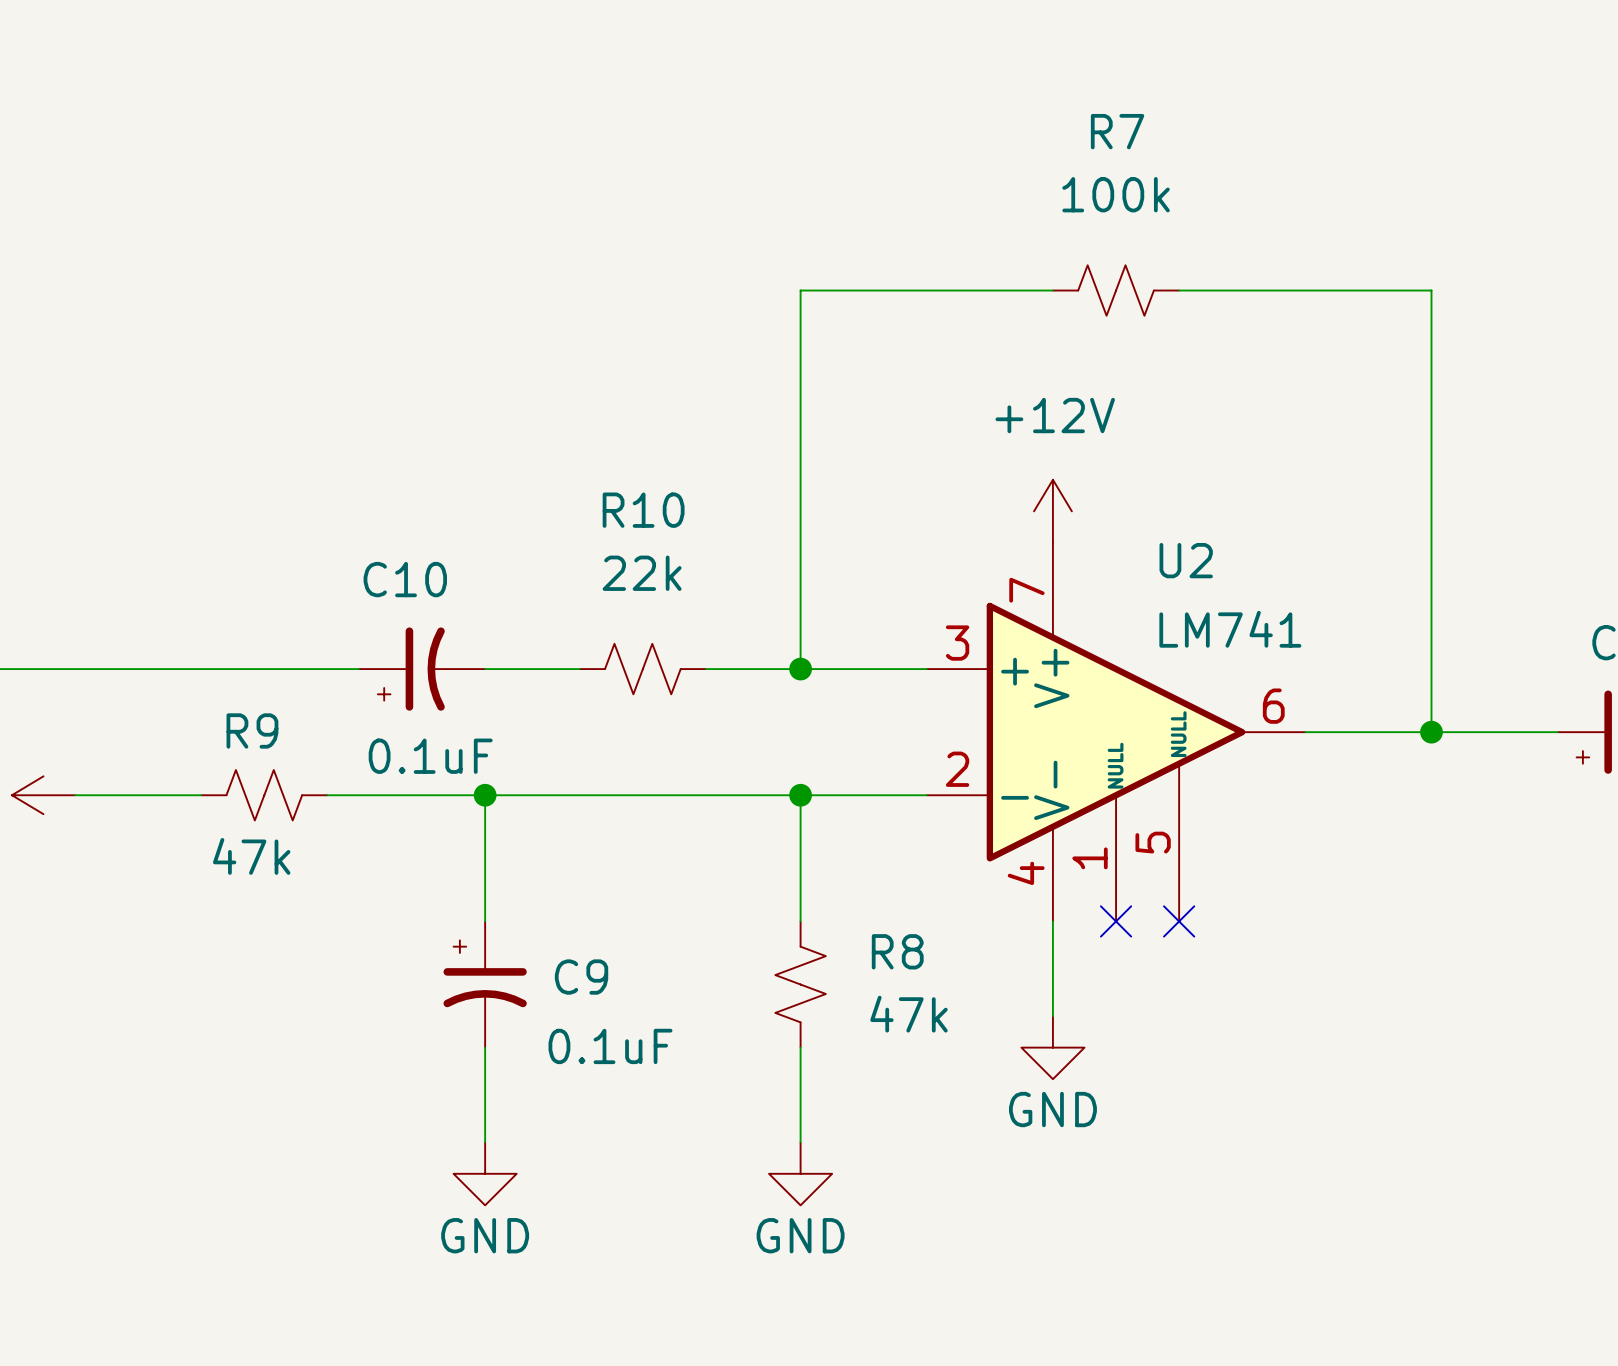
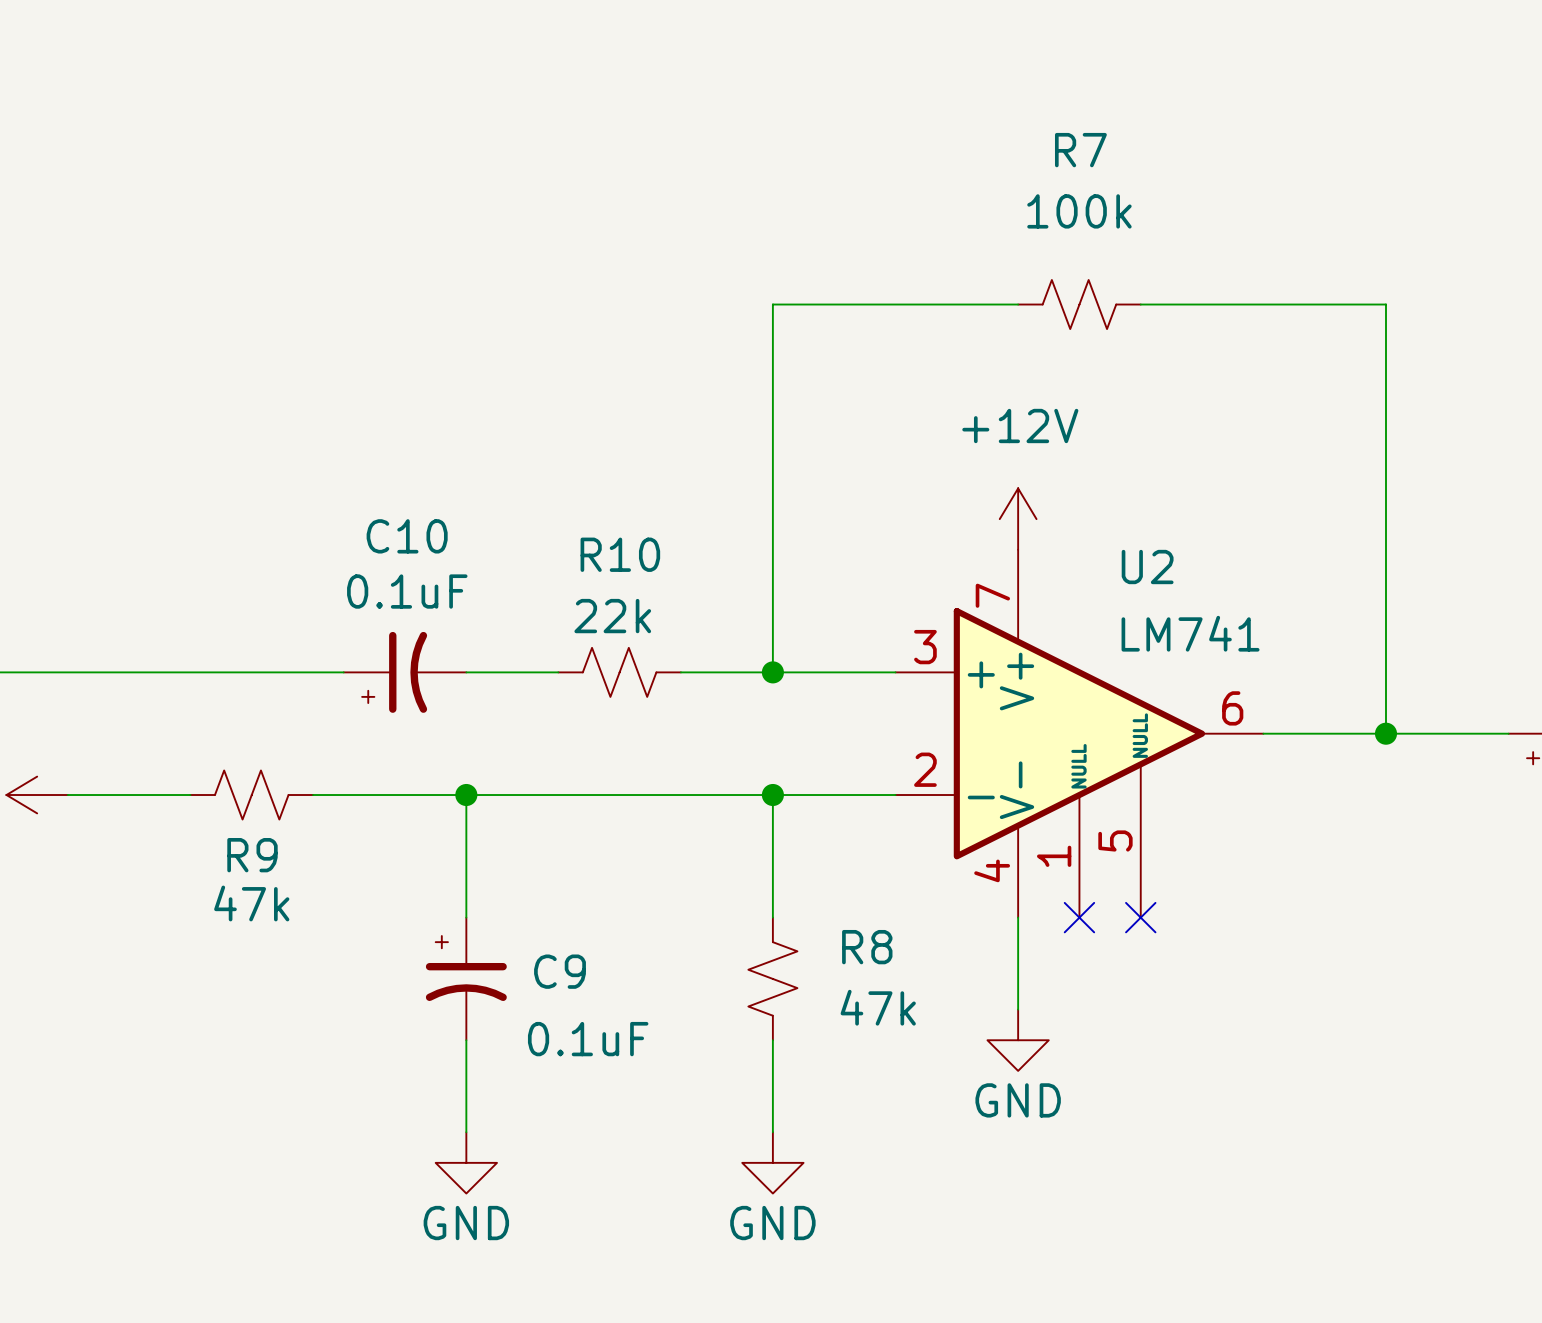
R10 name position: R10 (643, 510) -> R10 (620, 554)
R10 value position: 22k (642, 573) -> 22k (612, 616)
C10 name position: C10 (405, 579) -> C10 (407, 536)
R9 name position: R9 (252, 730) -> R9 (252, 855)
C10 value position: 0.1uF (430, 756) -> 0.1uF (407, 591)
R9 value position: 47k (251, 856) -> 47k (251, 903)

